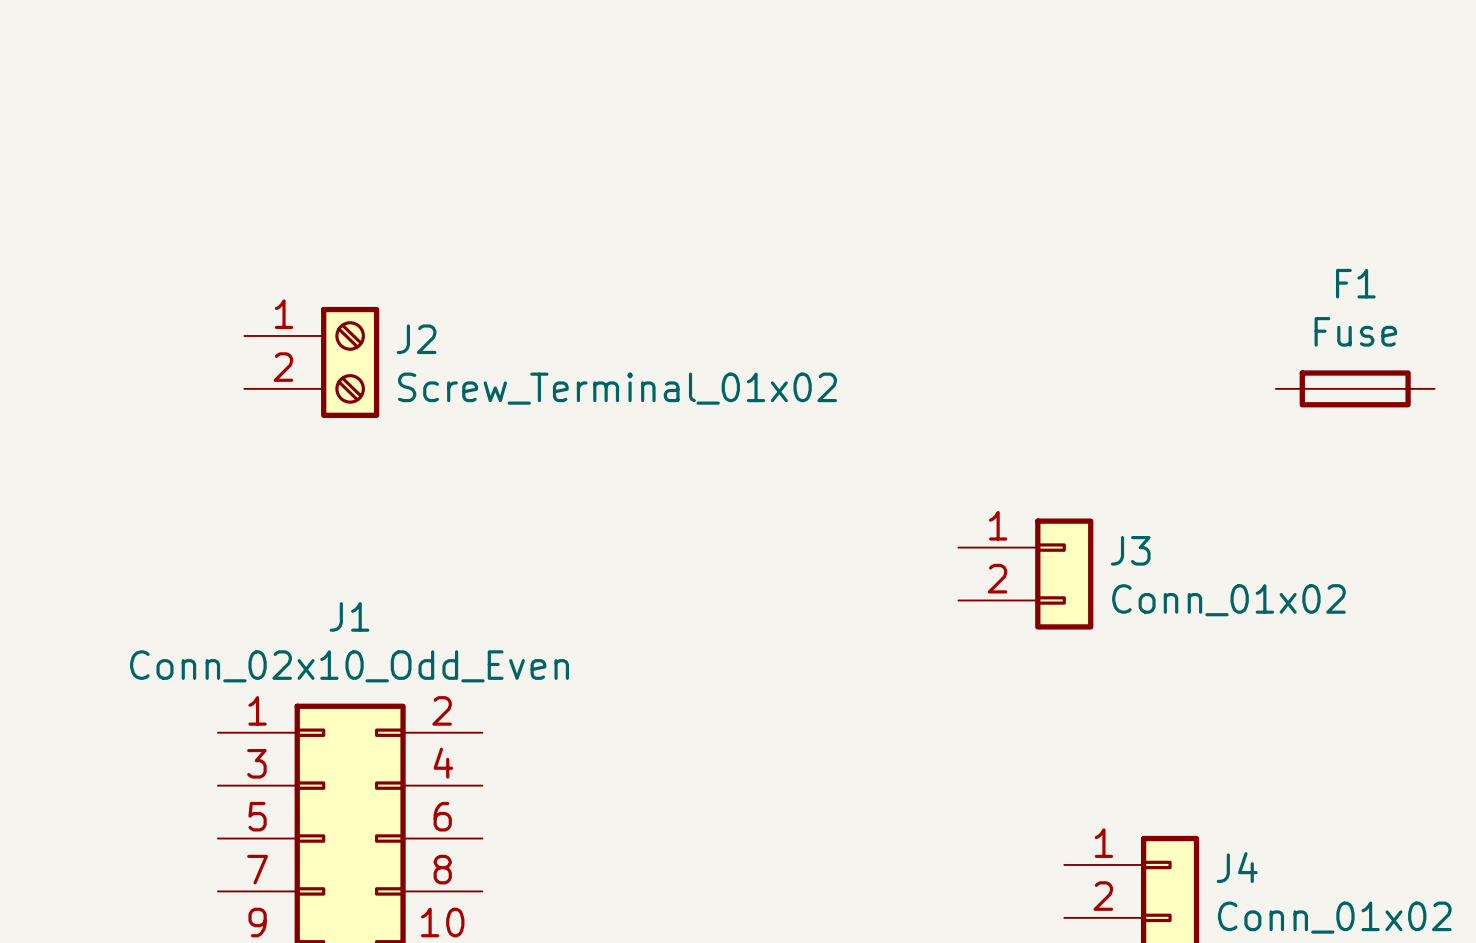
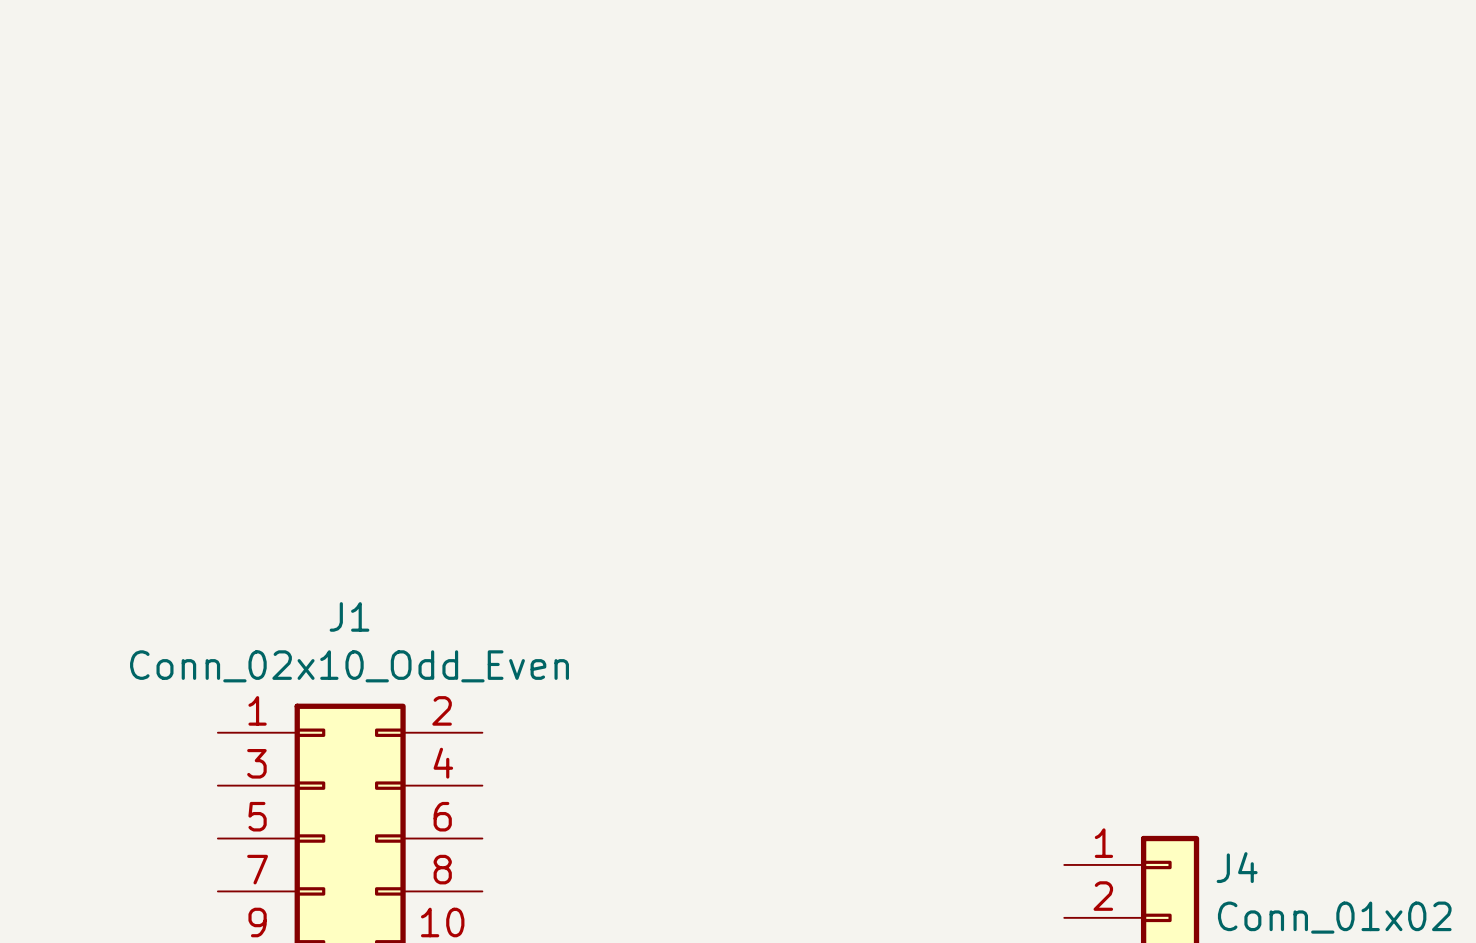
J2: Screw_Terminal_01x02 (311, 362) -> none
F1: Fuse (1355, 388) -> none
J3: Conn_01x02 (1025, 574) -> none

